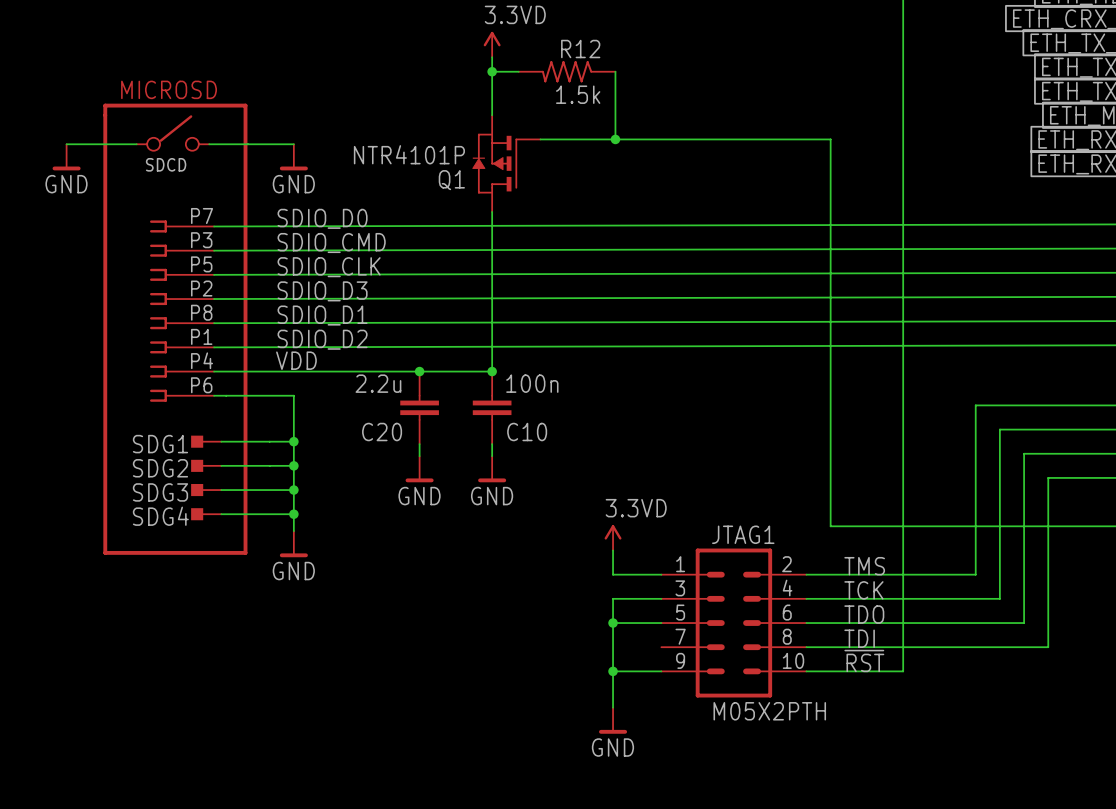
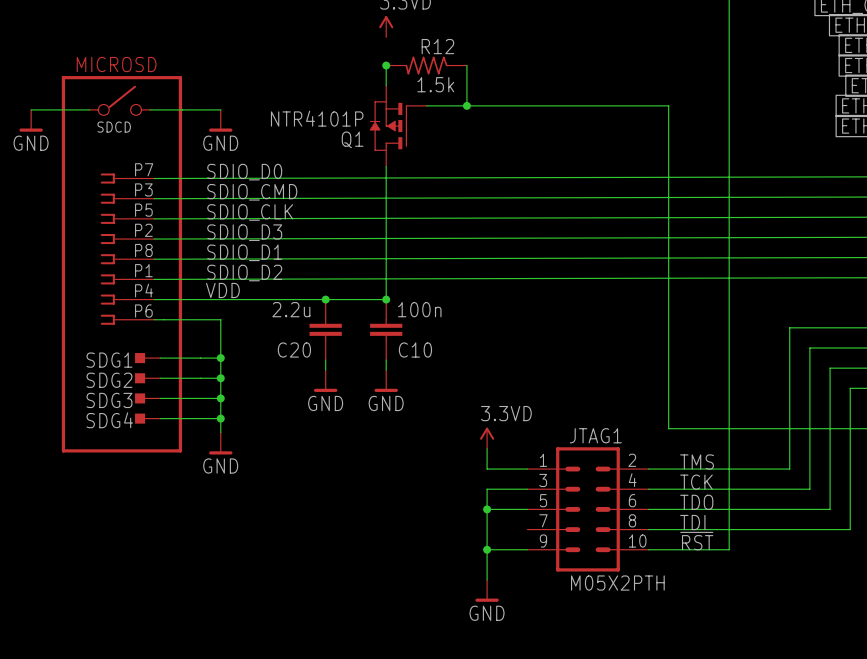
wire: (492, 57) (492, 91) -> none
wire: (492, 71) (518, 71) -> none
junction position: (492, 71) -> (386, 65)
R12 position: (567, 71) -> (426, 65)
wire: (615, 71) (615, 139) -> none
wire: none -> (466, 65) (466, 105)
junction position: (615, 139) -> (466, 105)

